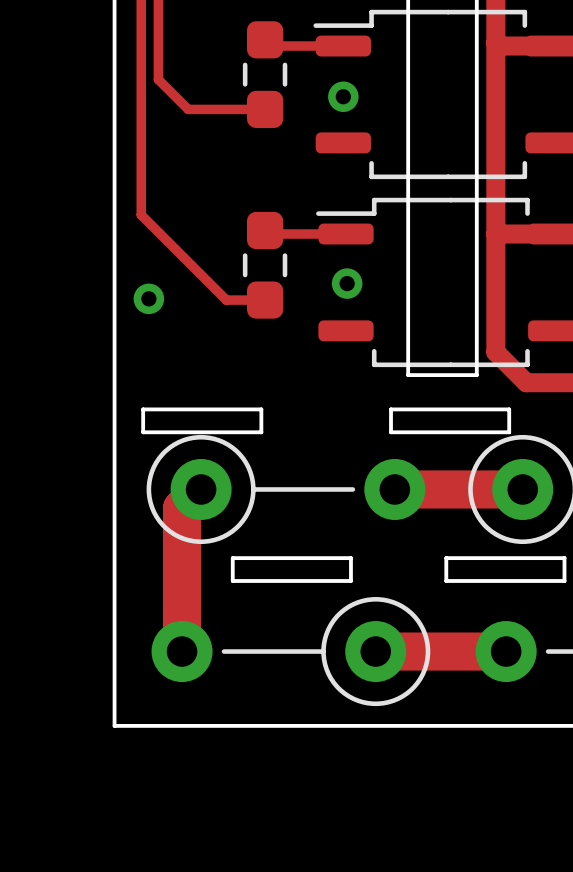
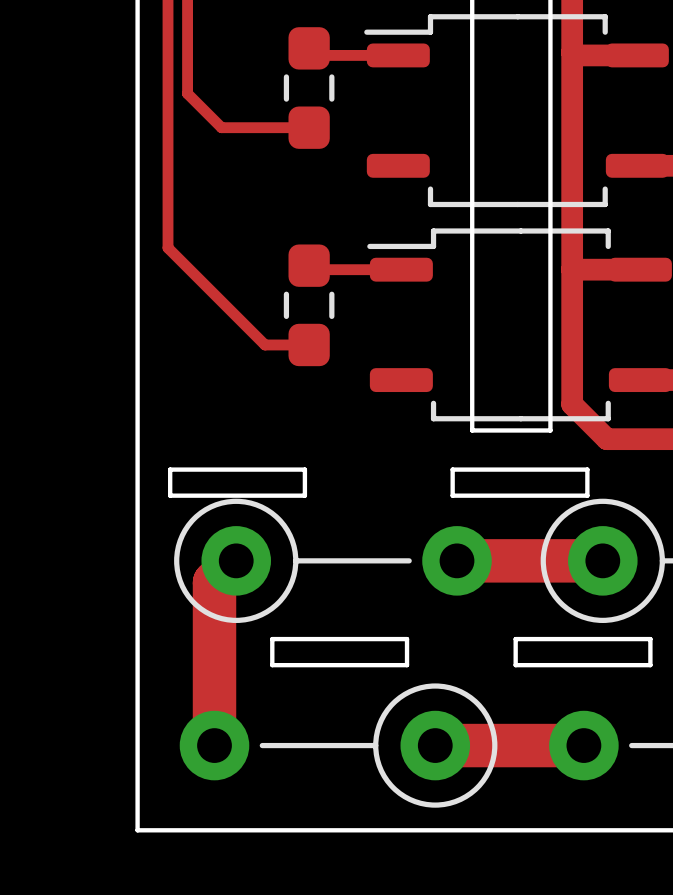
via: (343, 96) -> none
via: (347, 283) -> none
via: (148, 298) -> none

